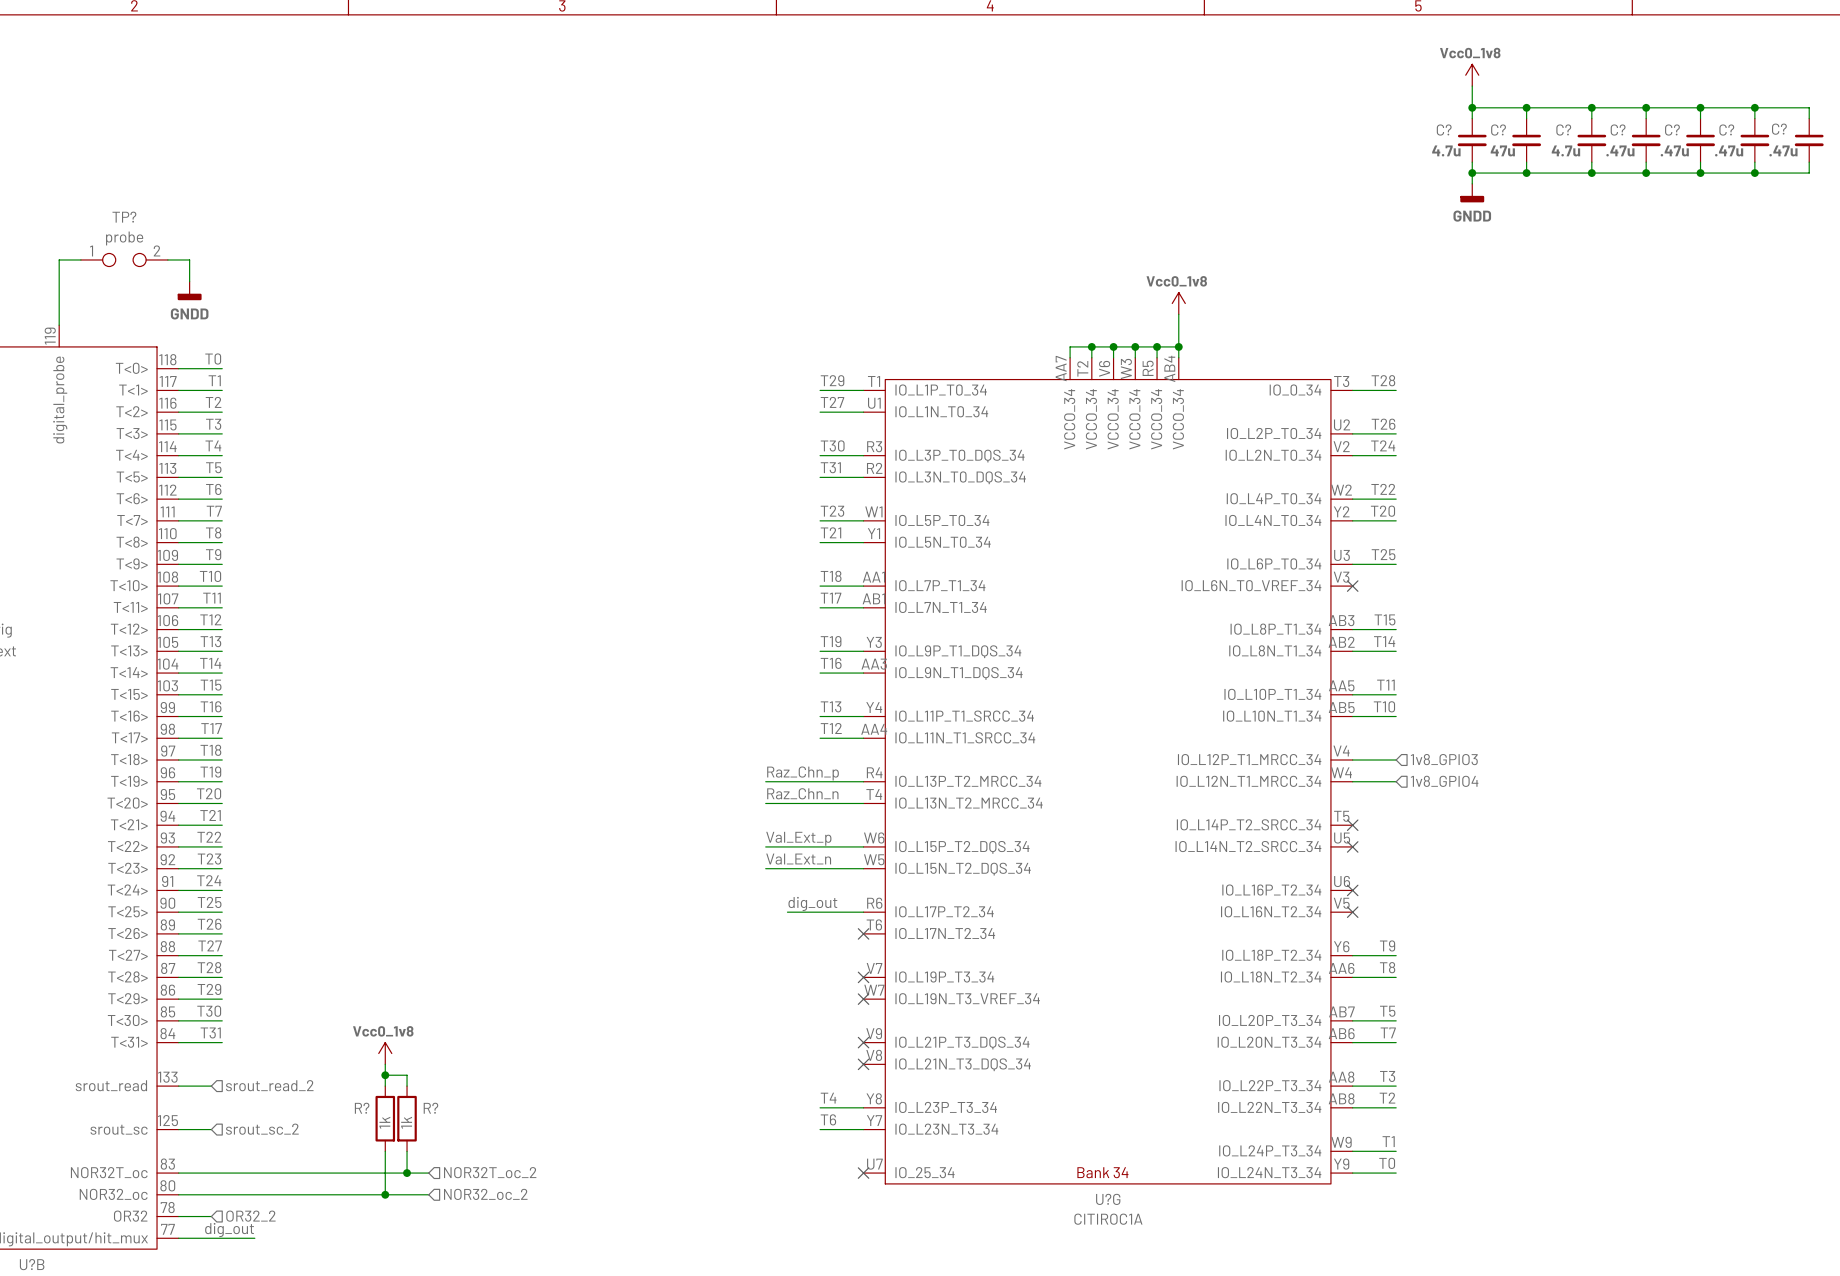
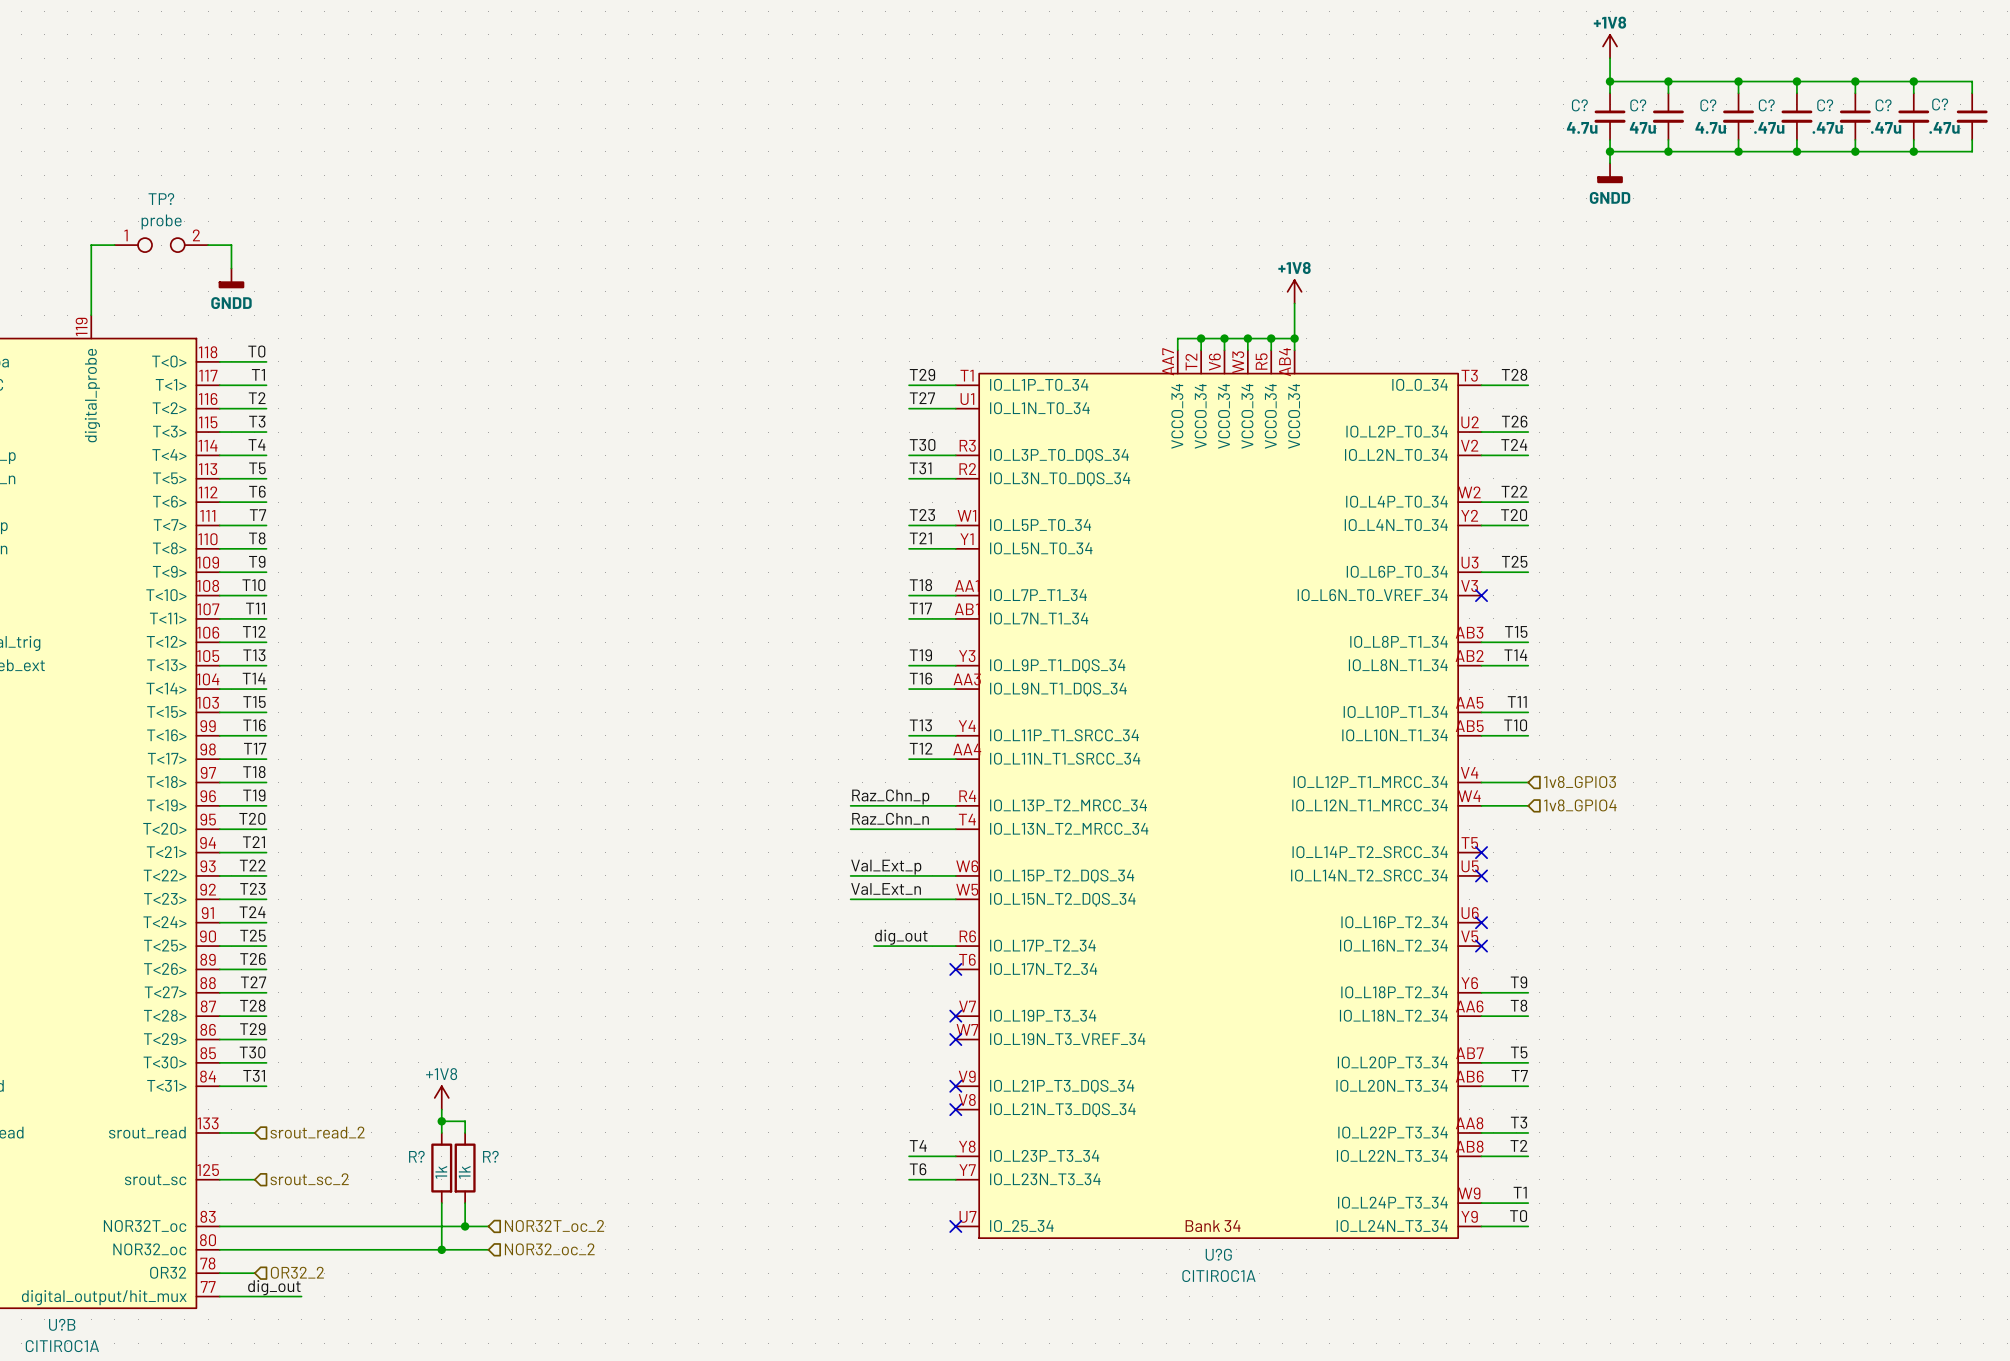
part: Vcc0_1v8 (1472, 75) -> none
power symbol: none -> +1V8 (1610, 46)
part: Vcc0_1v8 (1178, 303) -> none
power symbol: none -> +1V8 (1294, 291)
part: Vcc0_1v8 (385, 1053) -> none
power symbol: none -> +1V8 (441, 1097)

